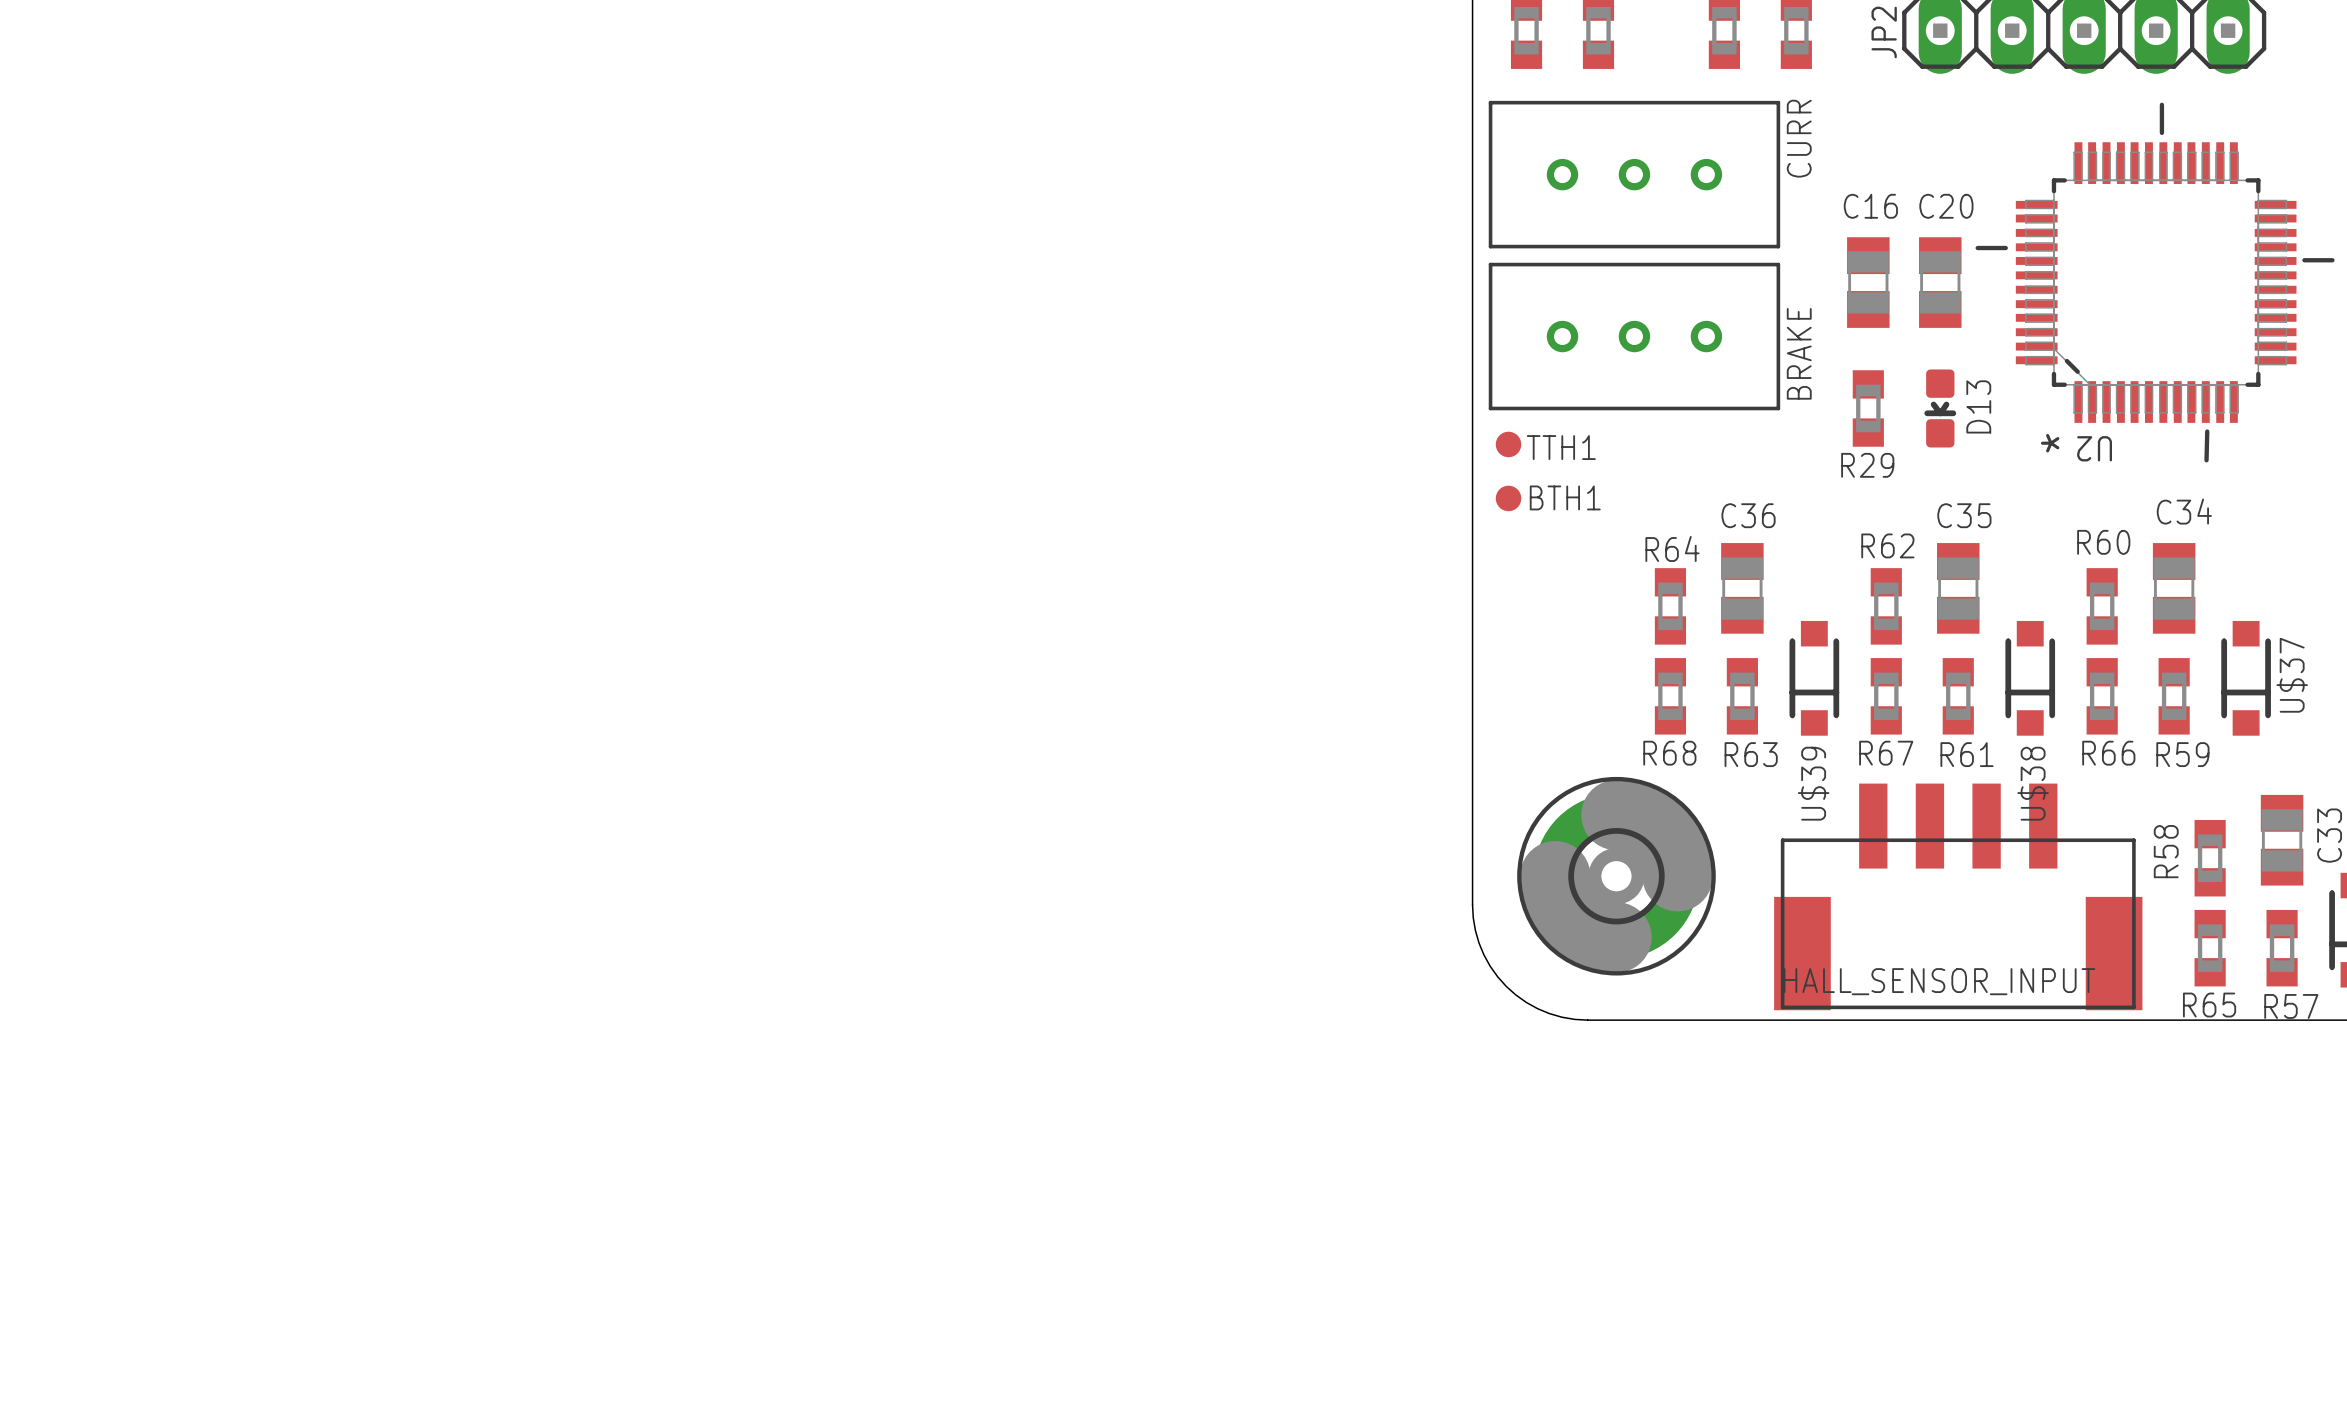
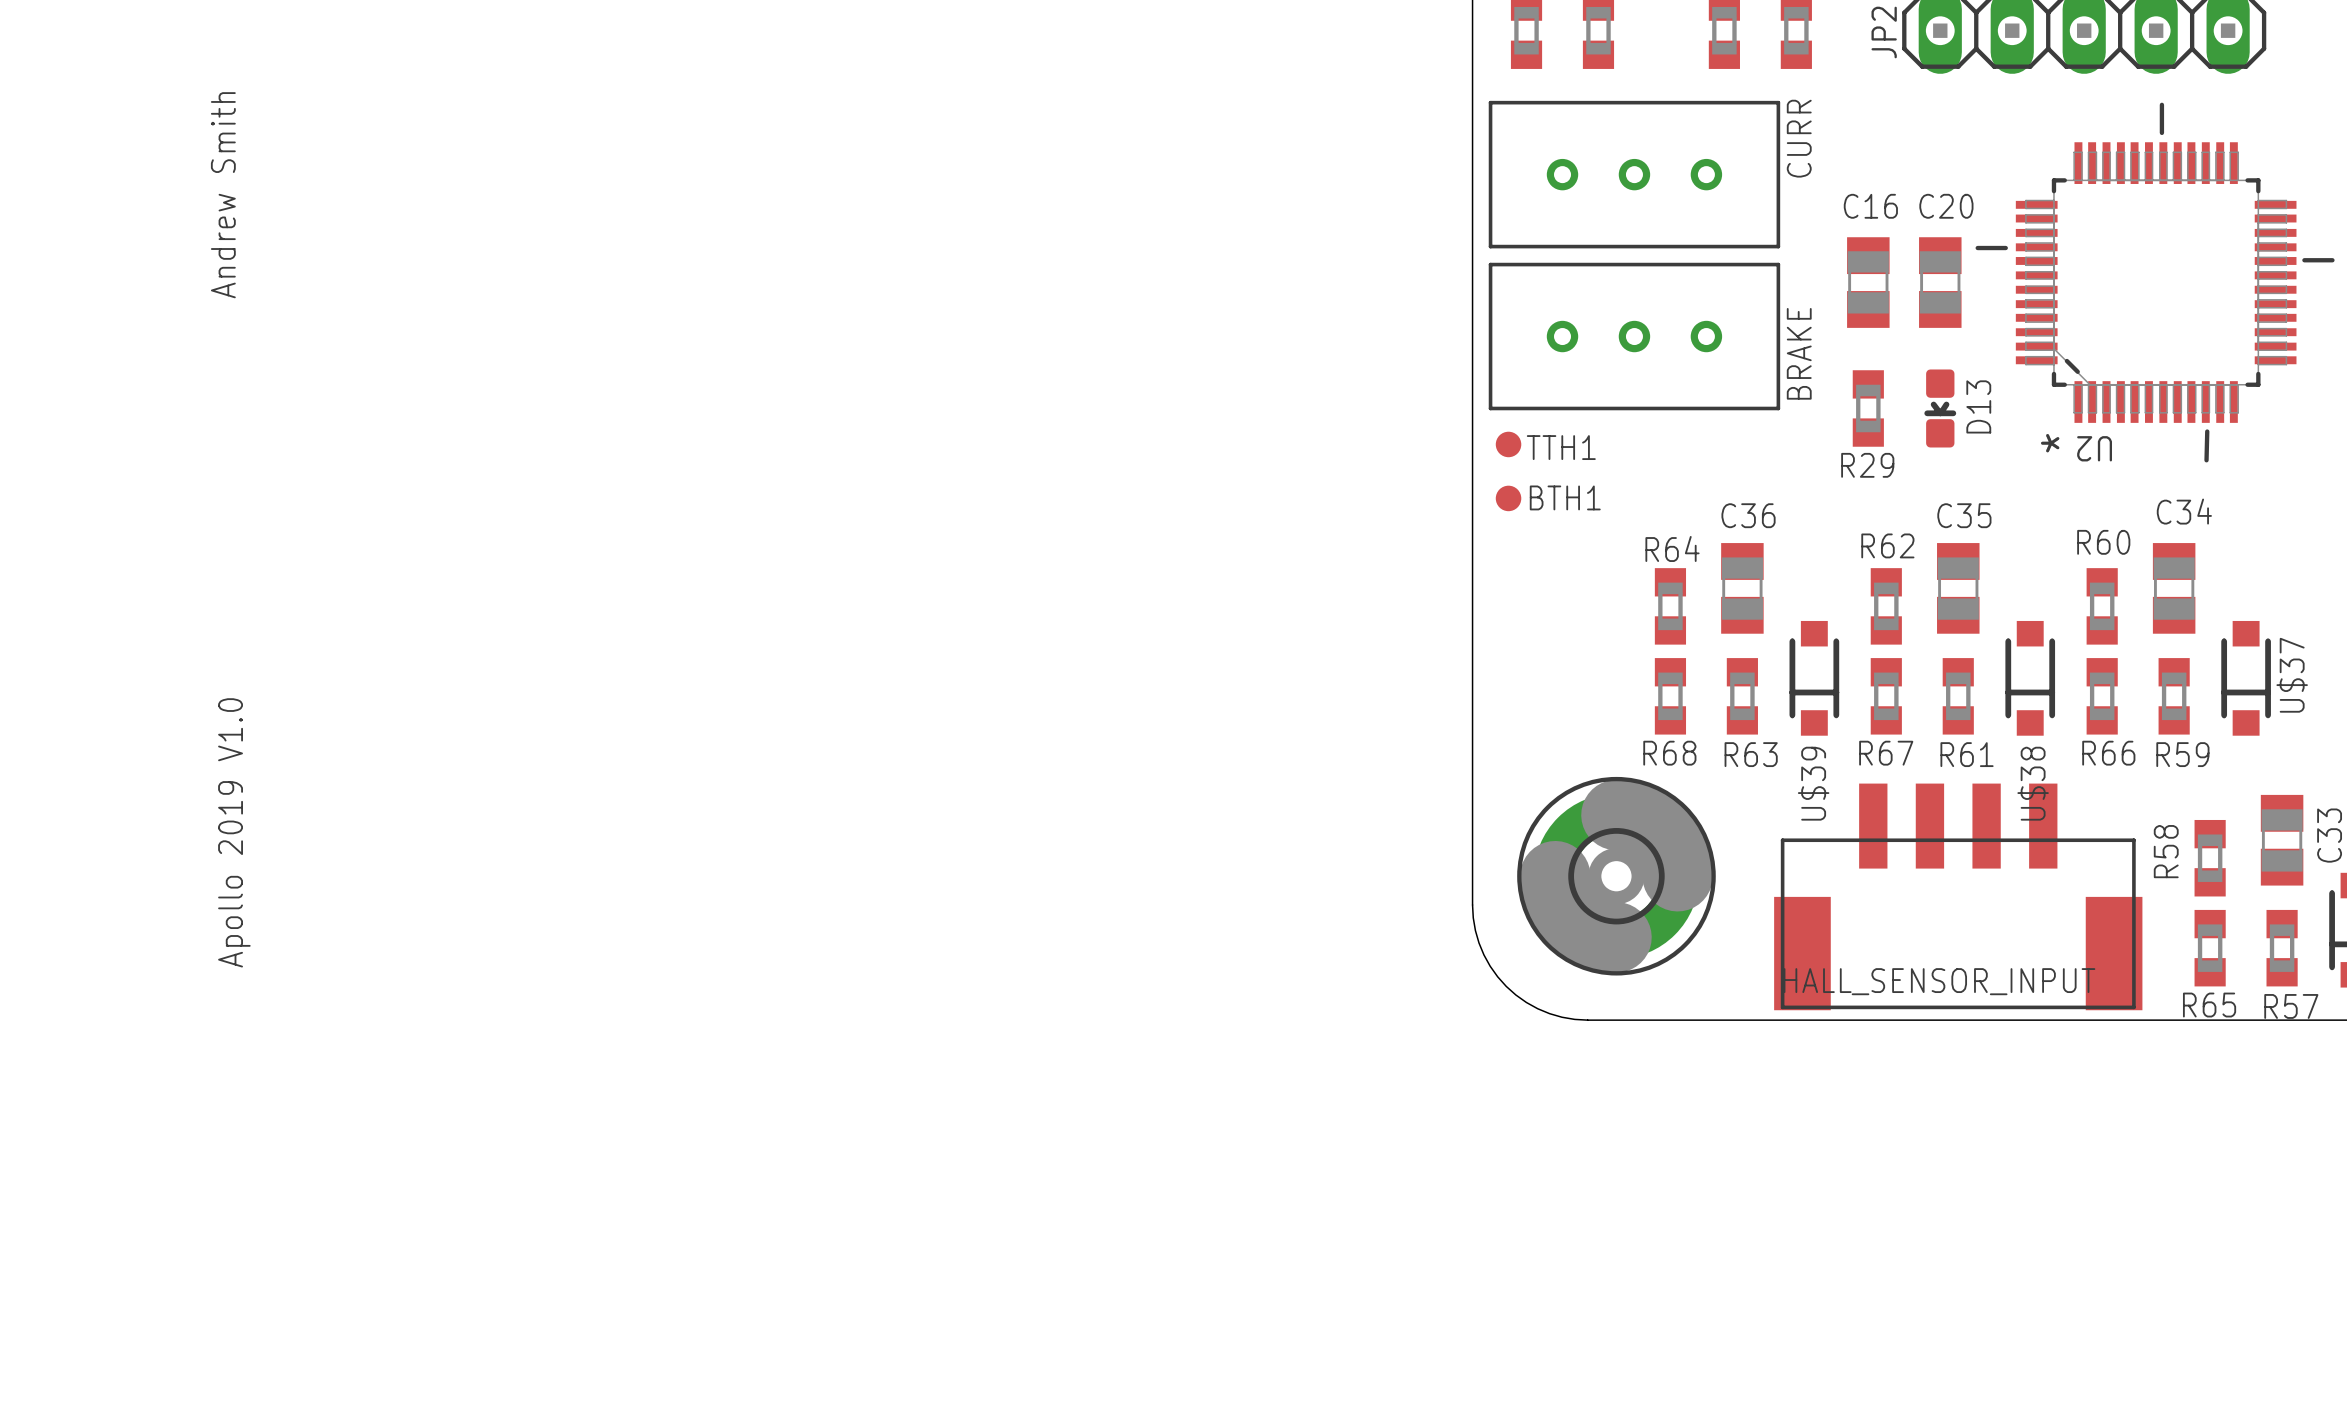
text: none -> Andrew Smith (223, 195)
text: none -> Apollo 2019 V1.0 (234, 832)

